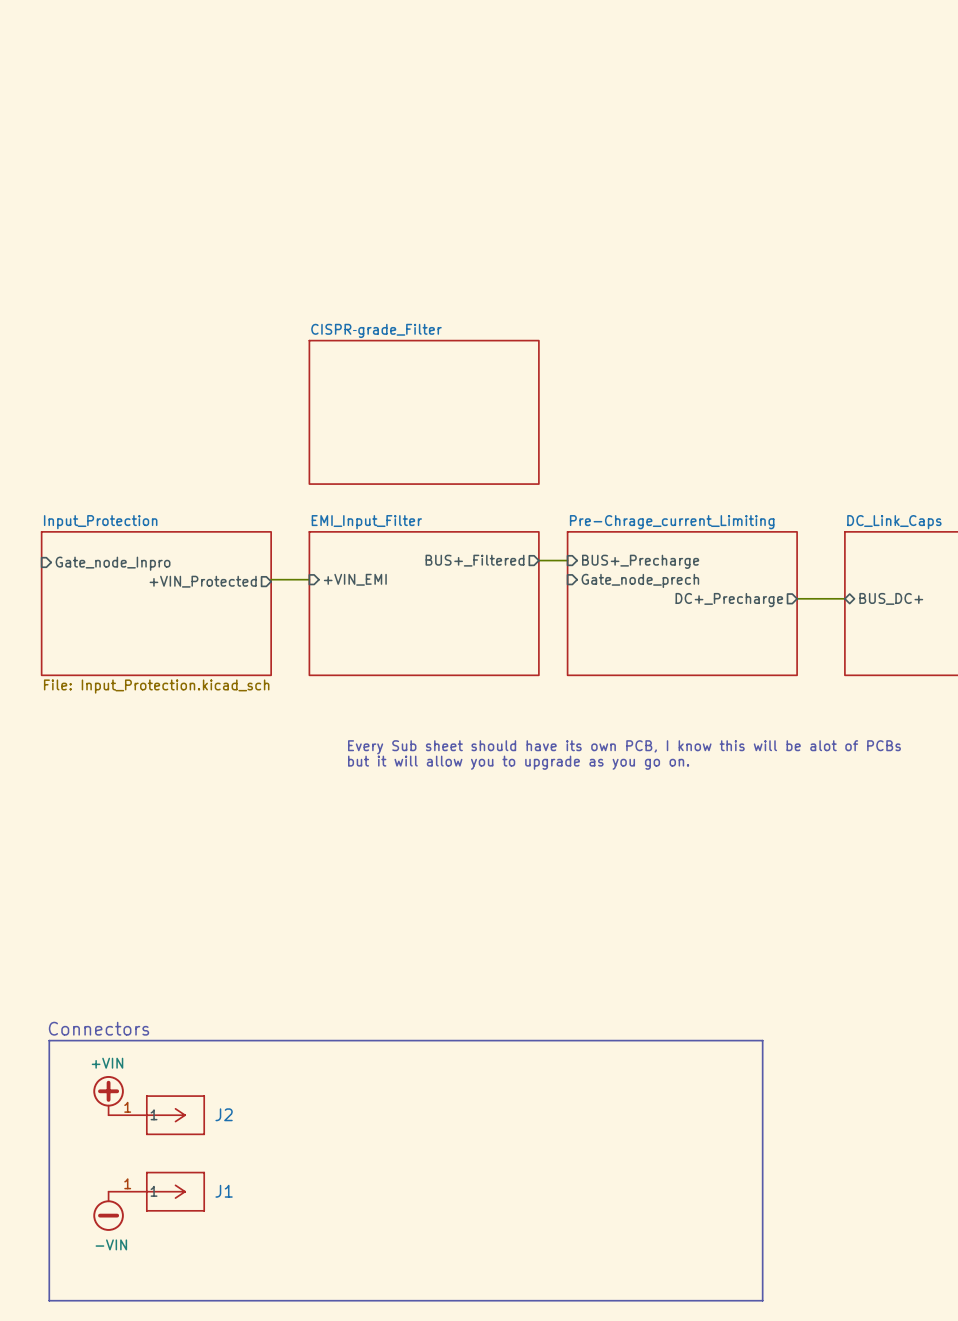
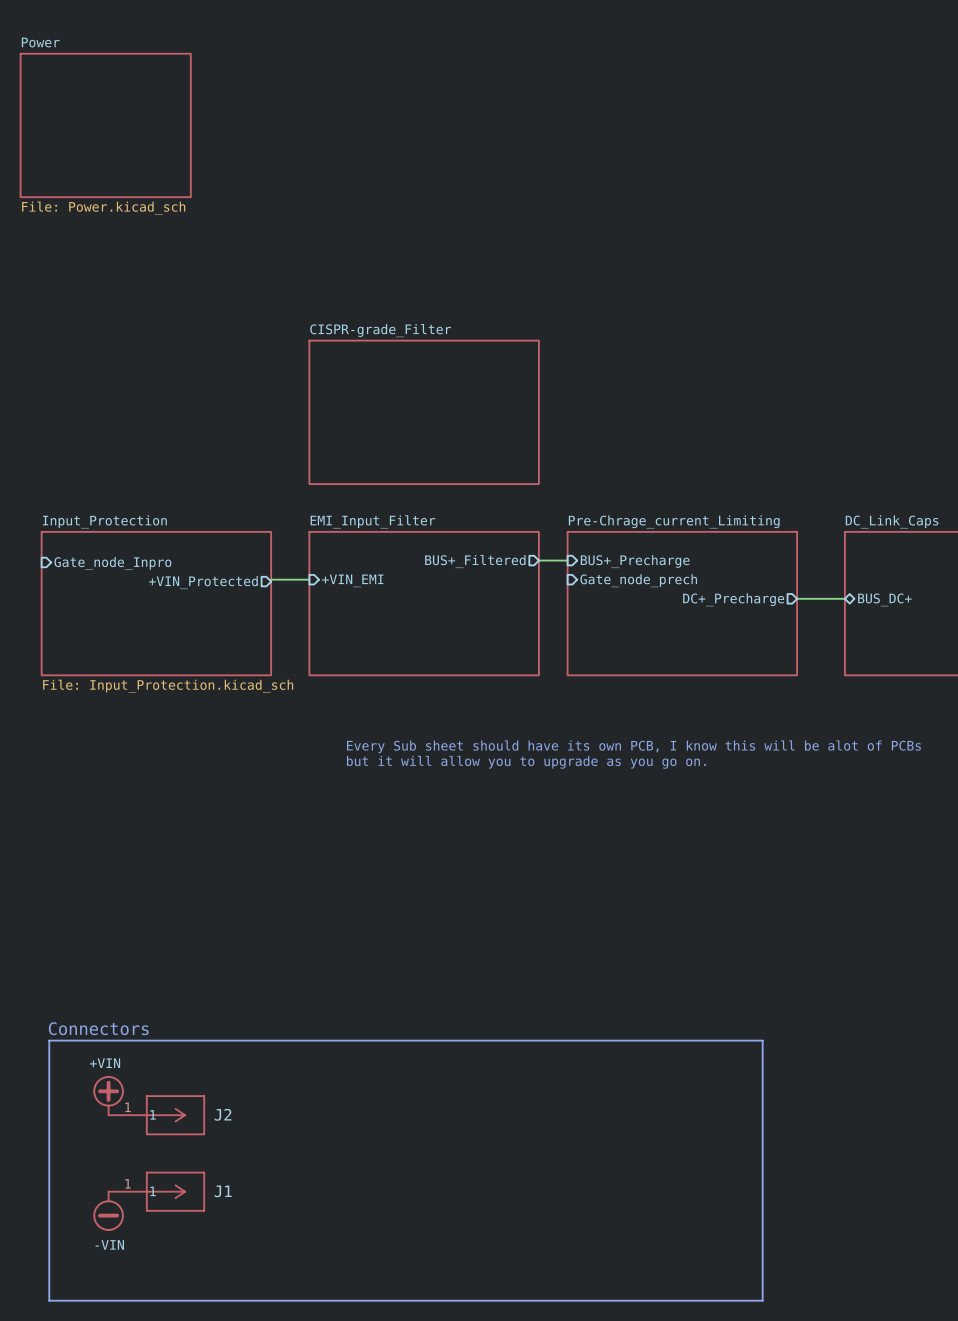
sheet Power: none -> File: Power.kicad_sch (105, 125)

